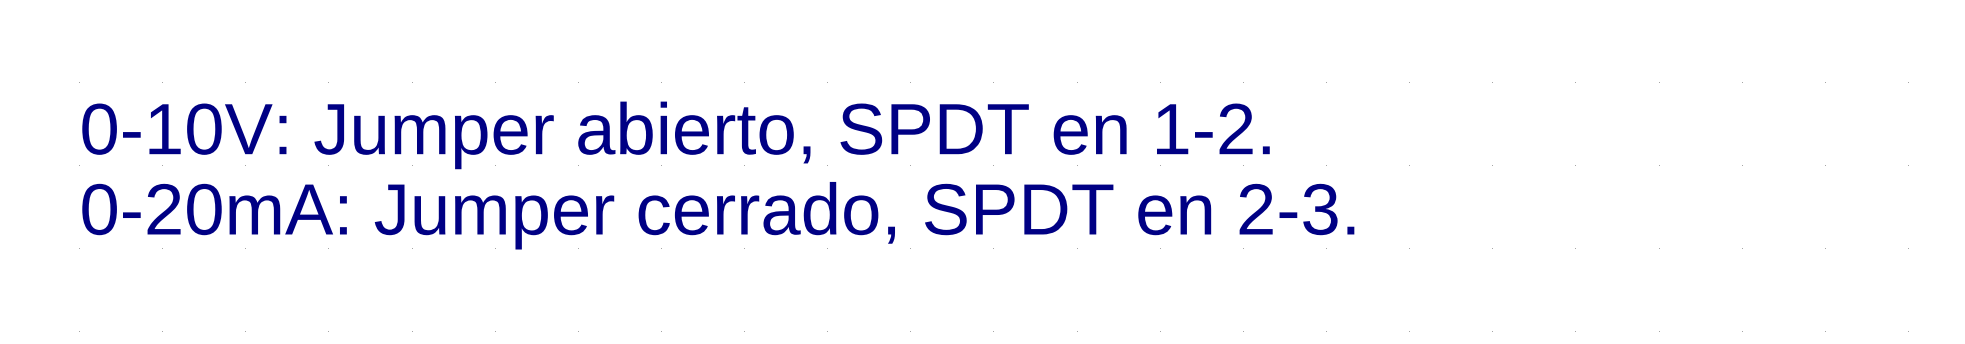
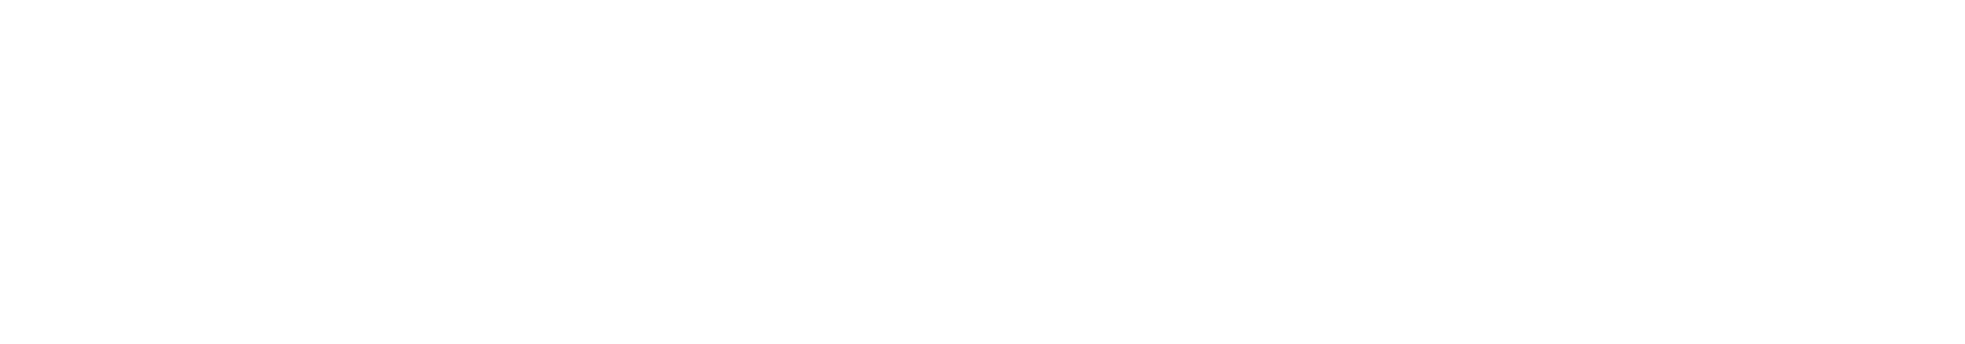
text: 0-10V: Jumper abierto, SPDT en 1-2. (676, 135) -> none
text: 0-20mA: Jumper cerrado, SPDT en 2-3. (718, 215) -> none

